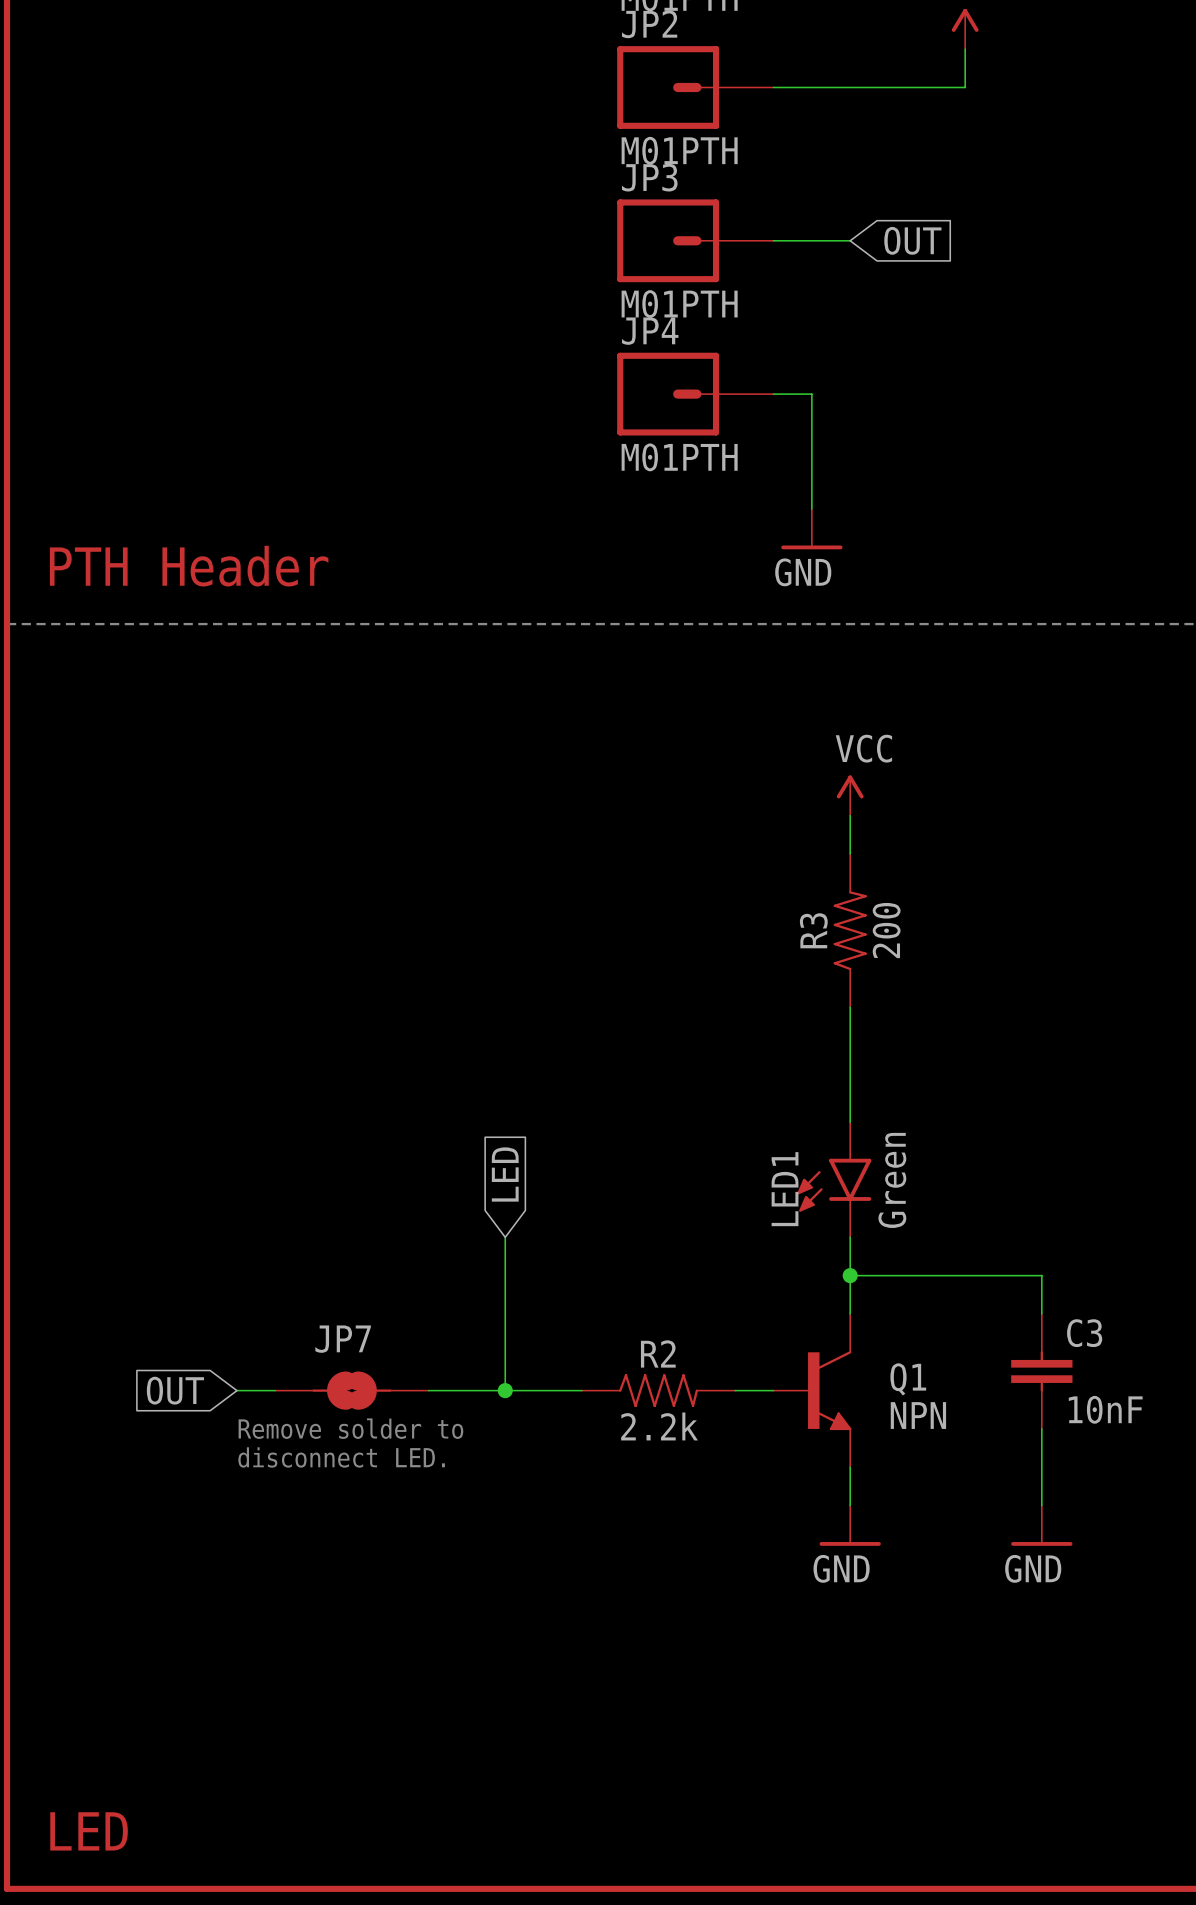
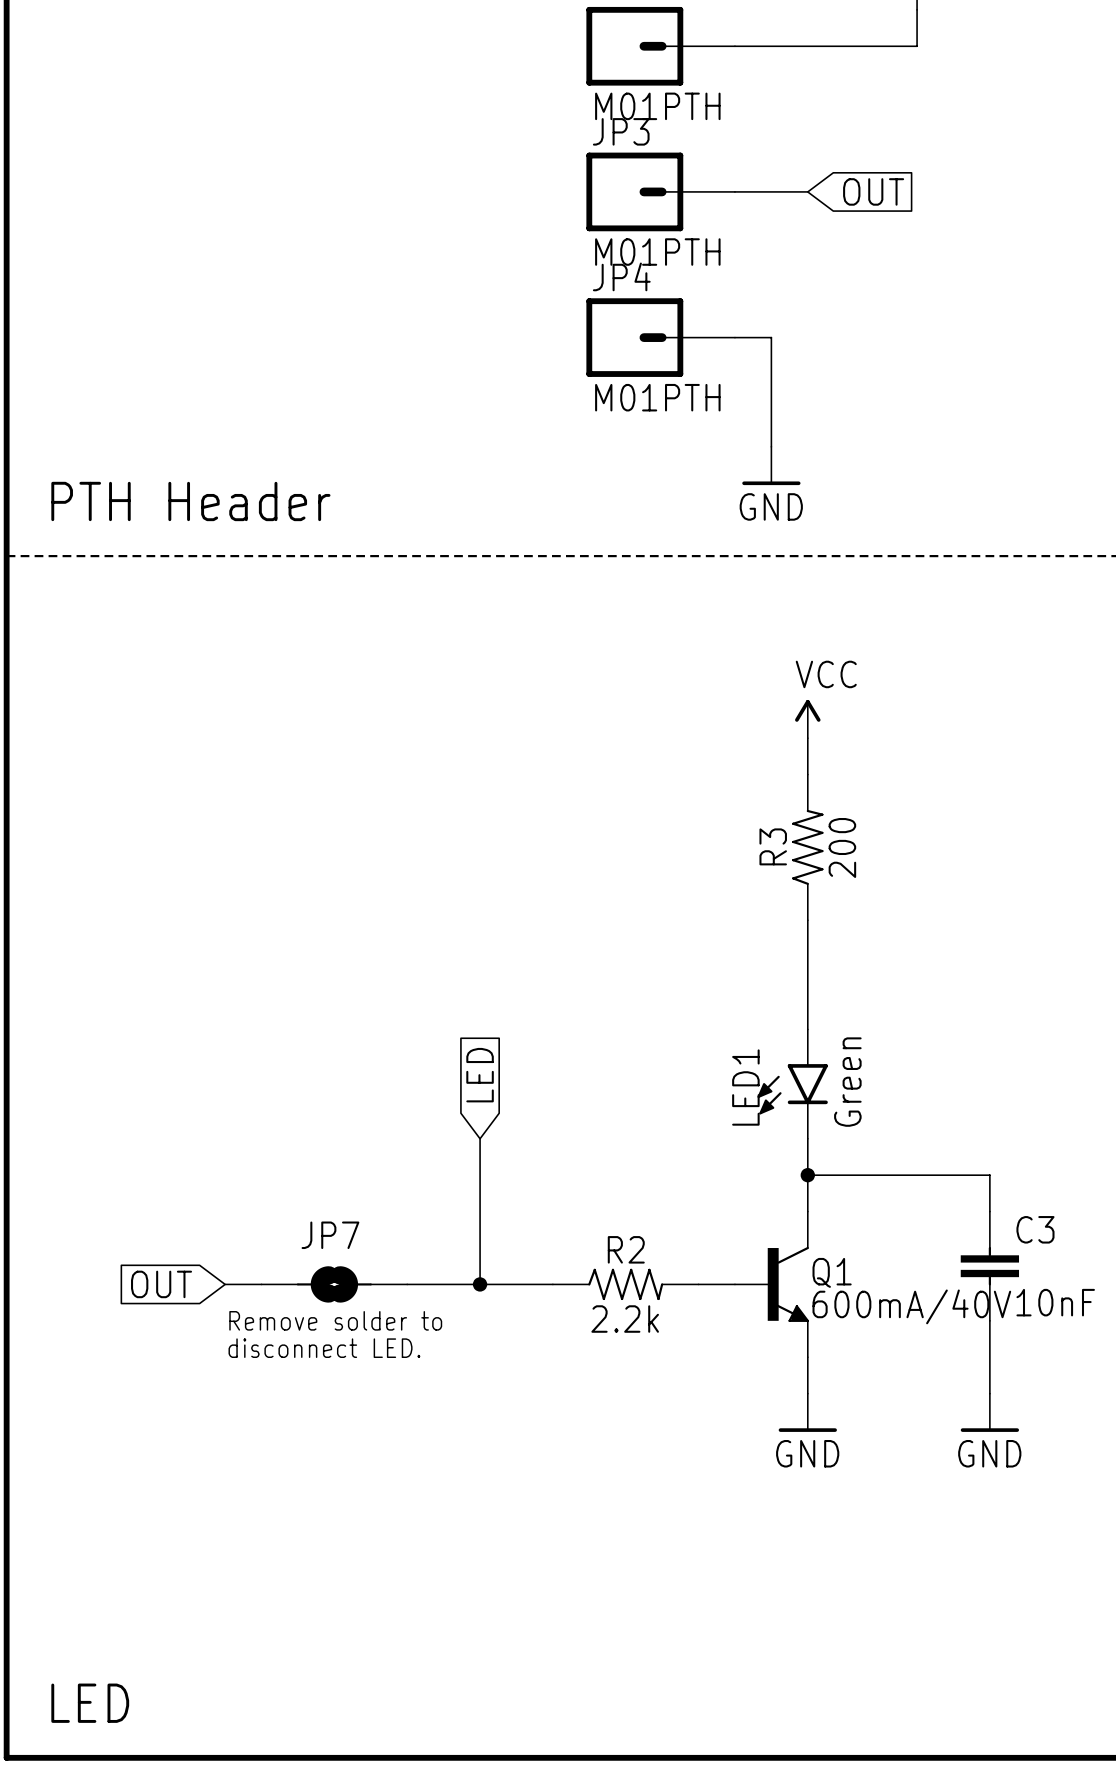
Q1 name position: Q1 (908, 1379) -> Q1 (832, 1272)
Q1 value: NPN (918, 1415) -> 600mA/40V (911, 1306)

